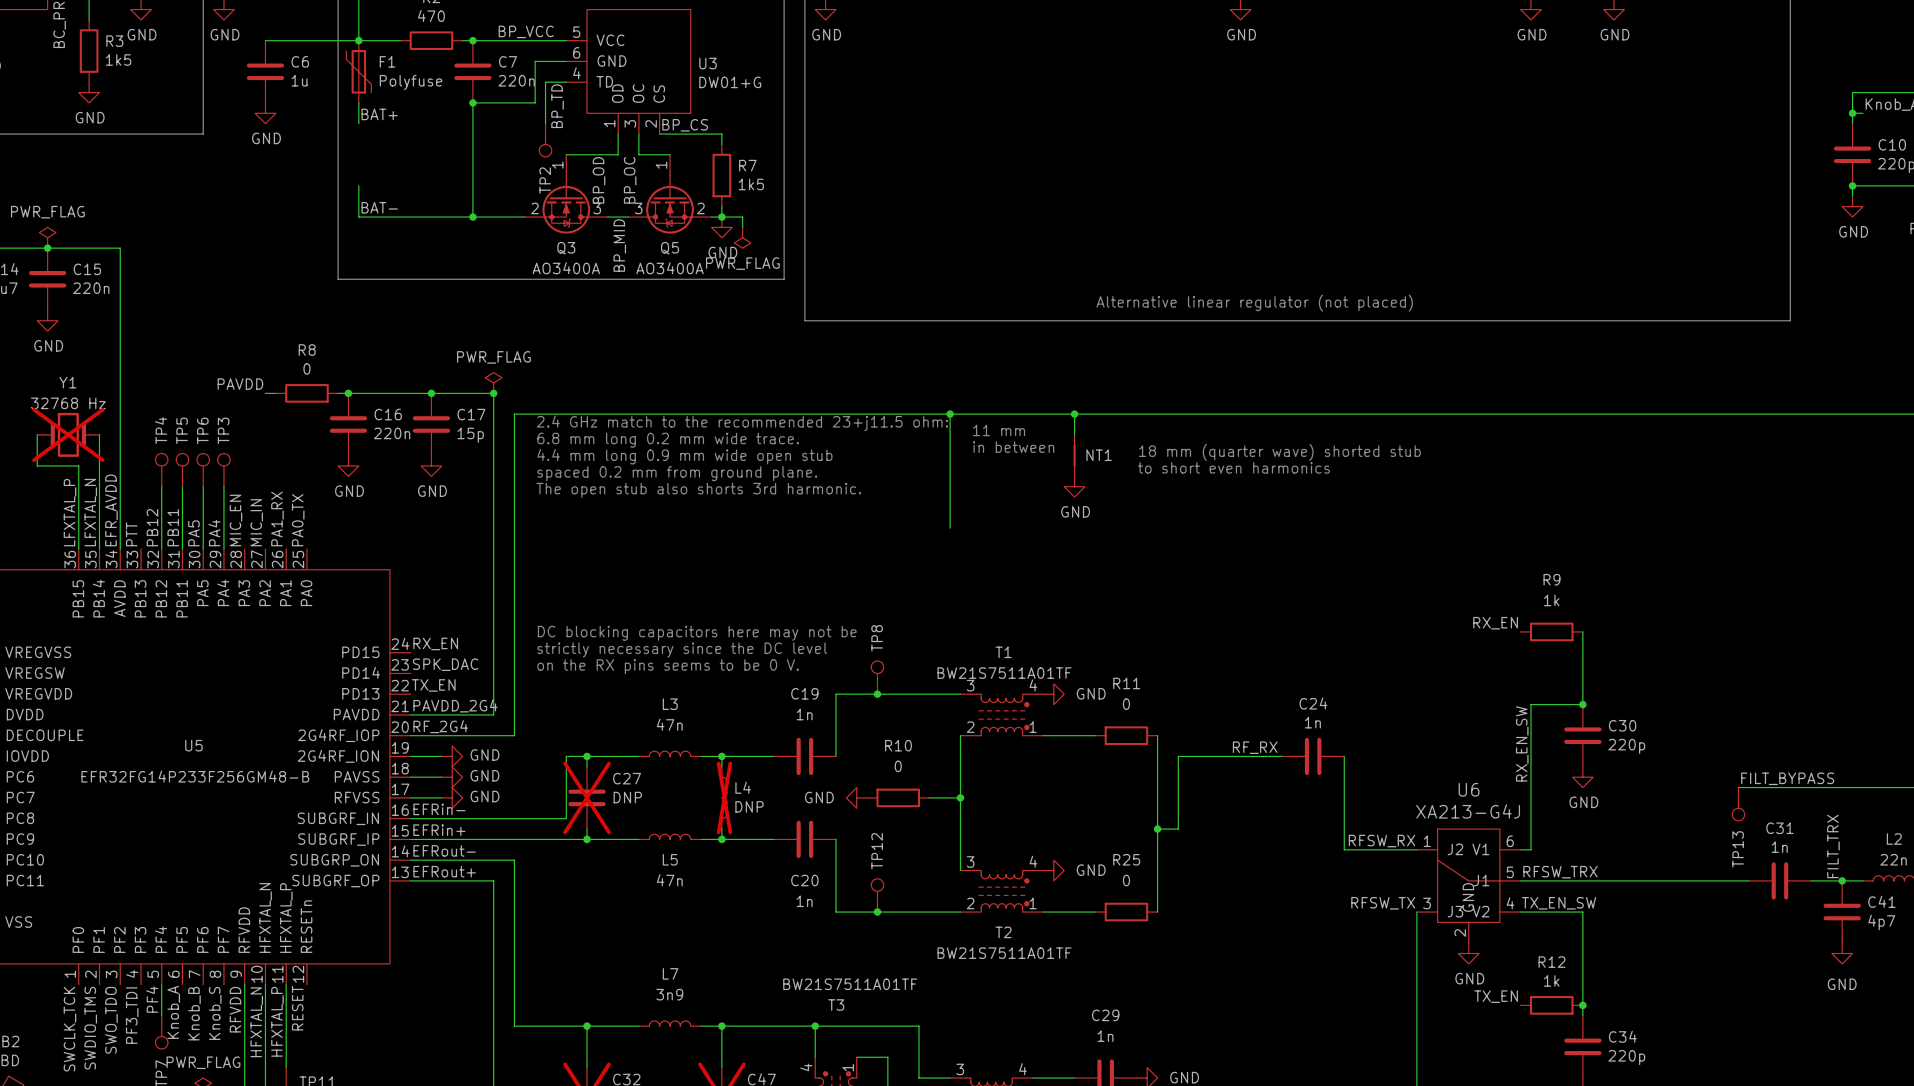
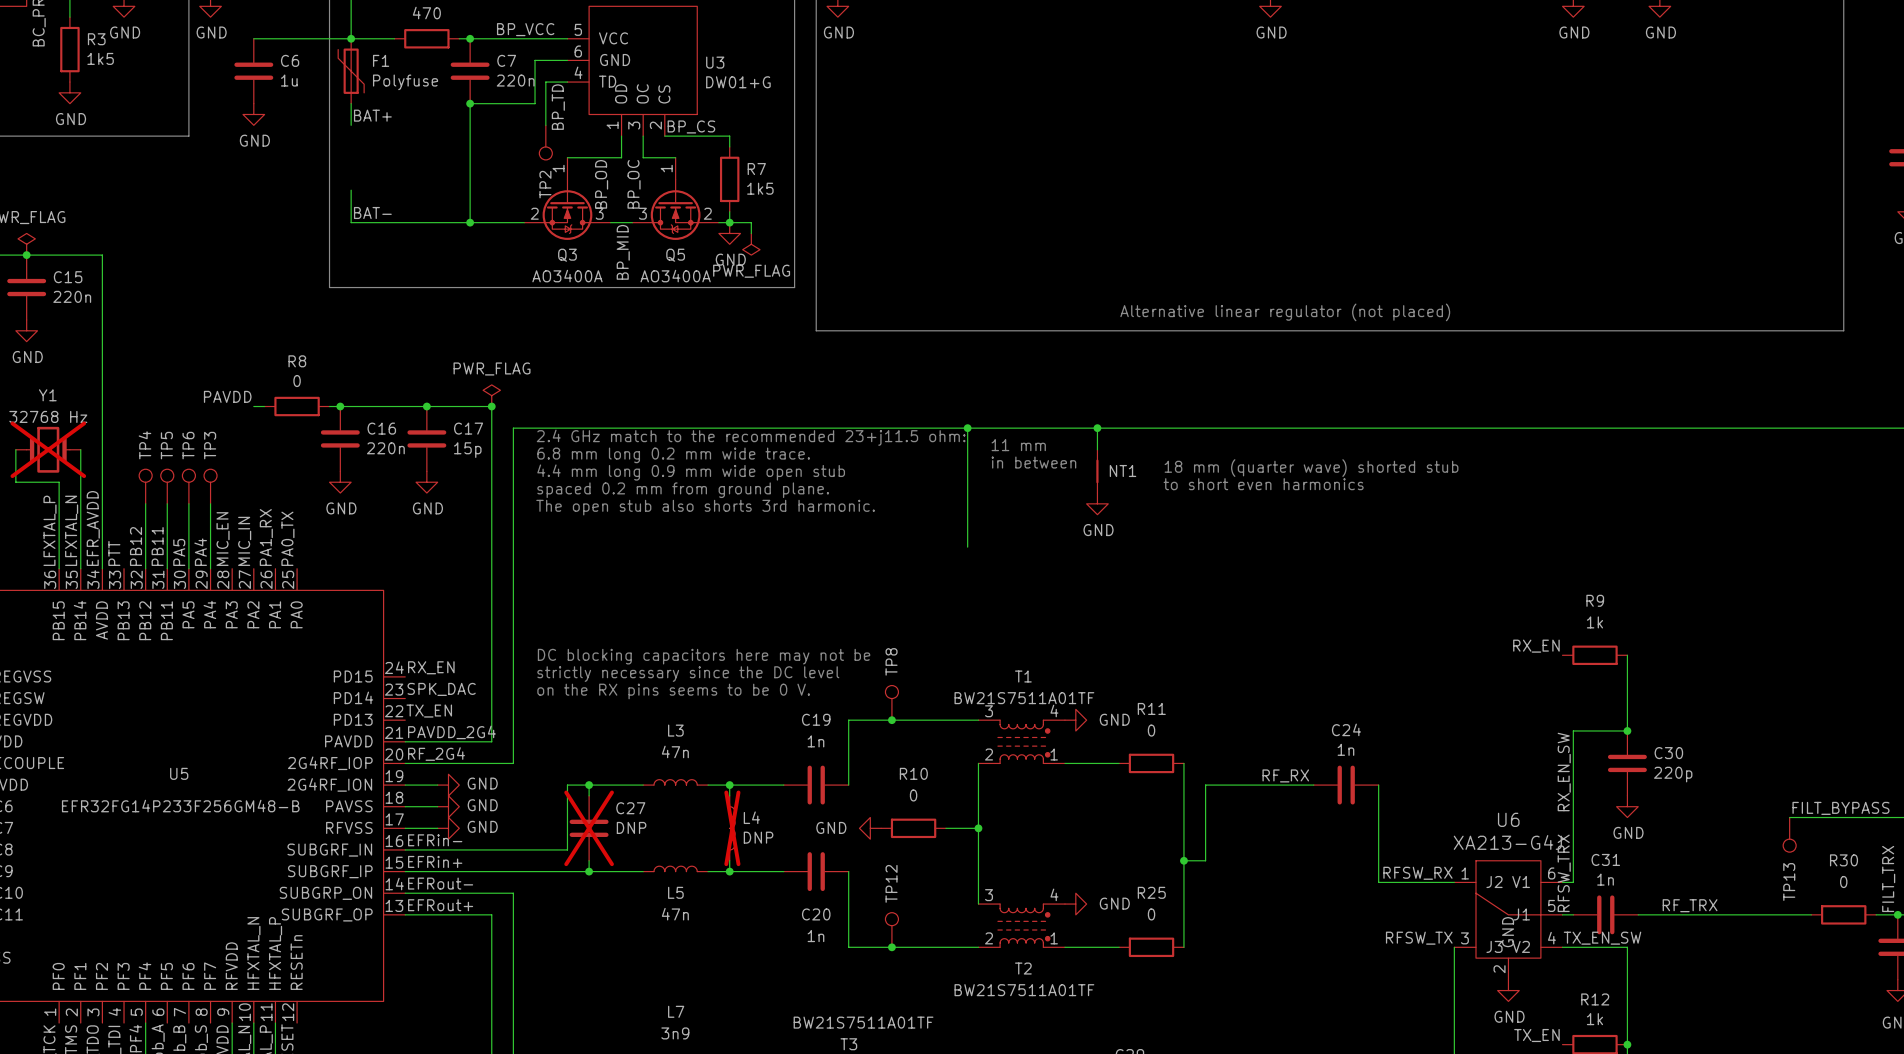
label rotation: 0° (1560, 872) -> 90° counterclockwise (1564, 873)
label: none -> RF_TRX (1690, 905)
C31 position: (1779, 880) -> (1605, 914)
R30: none -> 0 (1843, 914)

